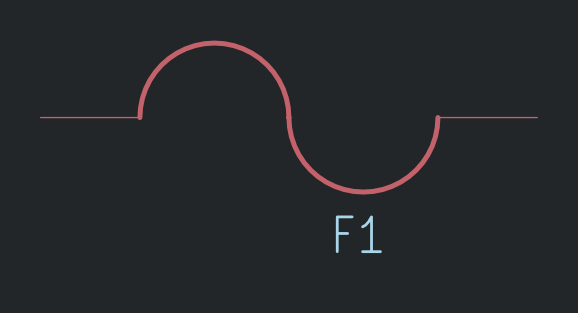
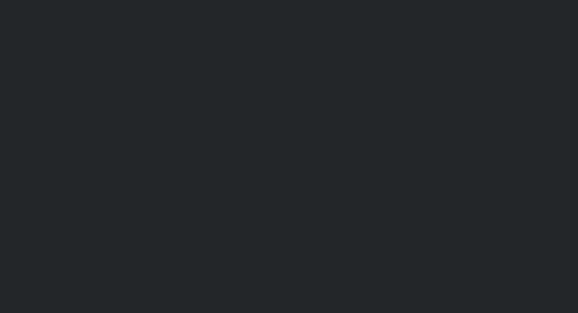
F1: (288, 117) -> none

